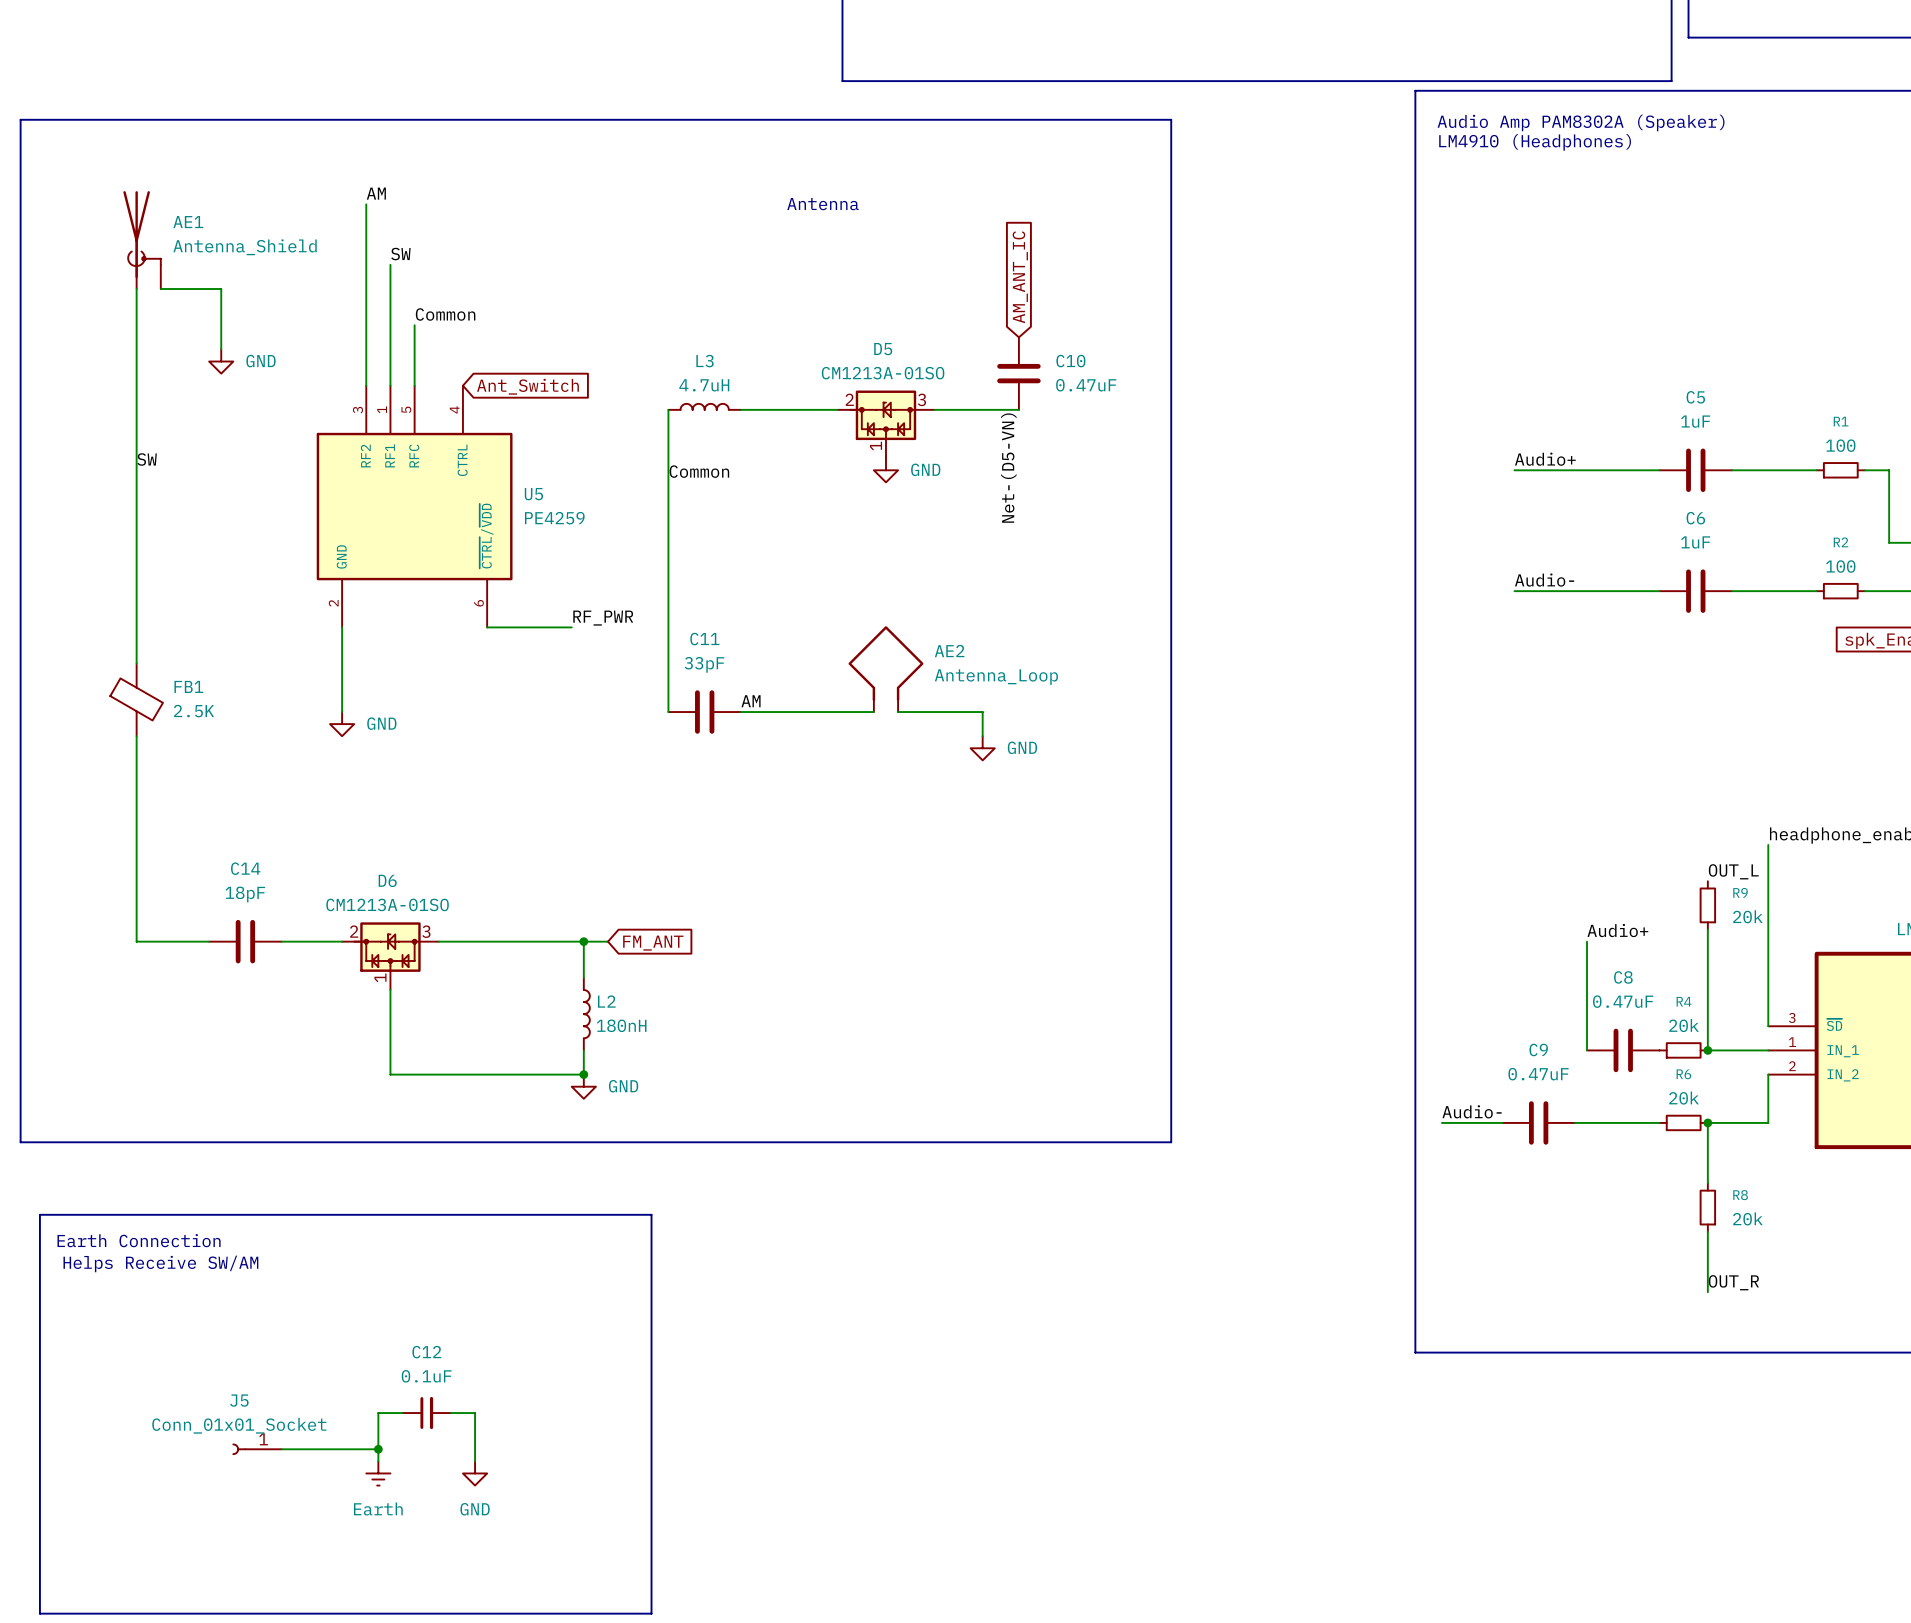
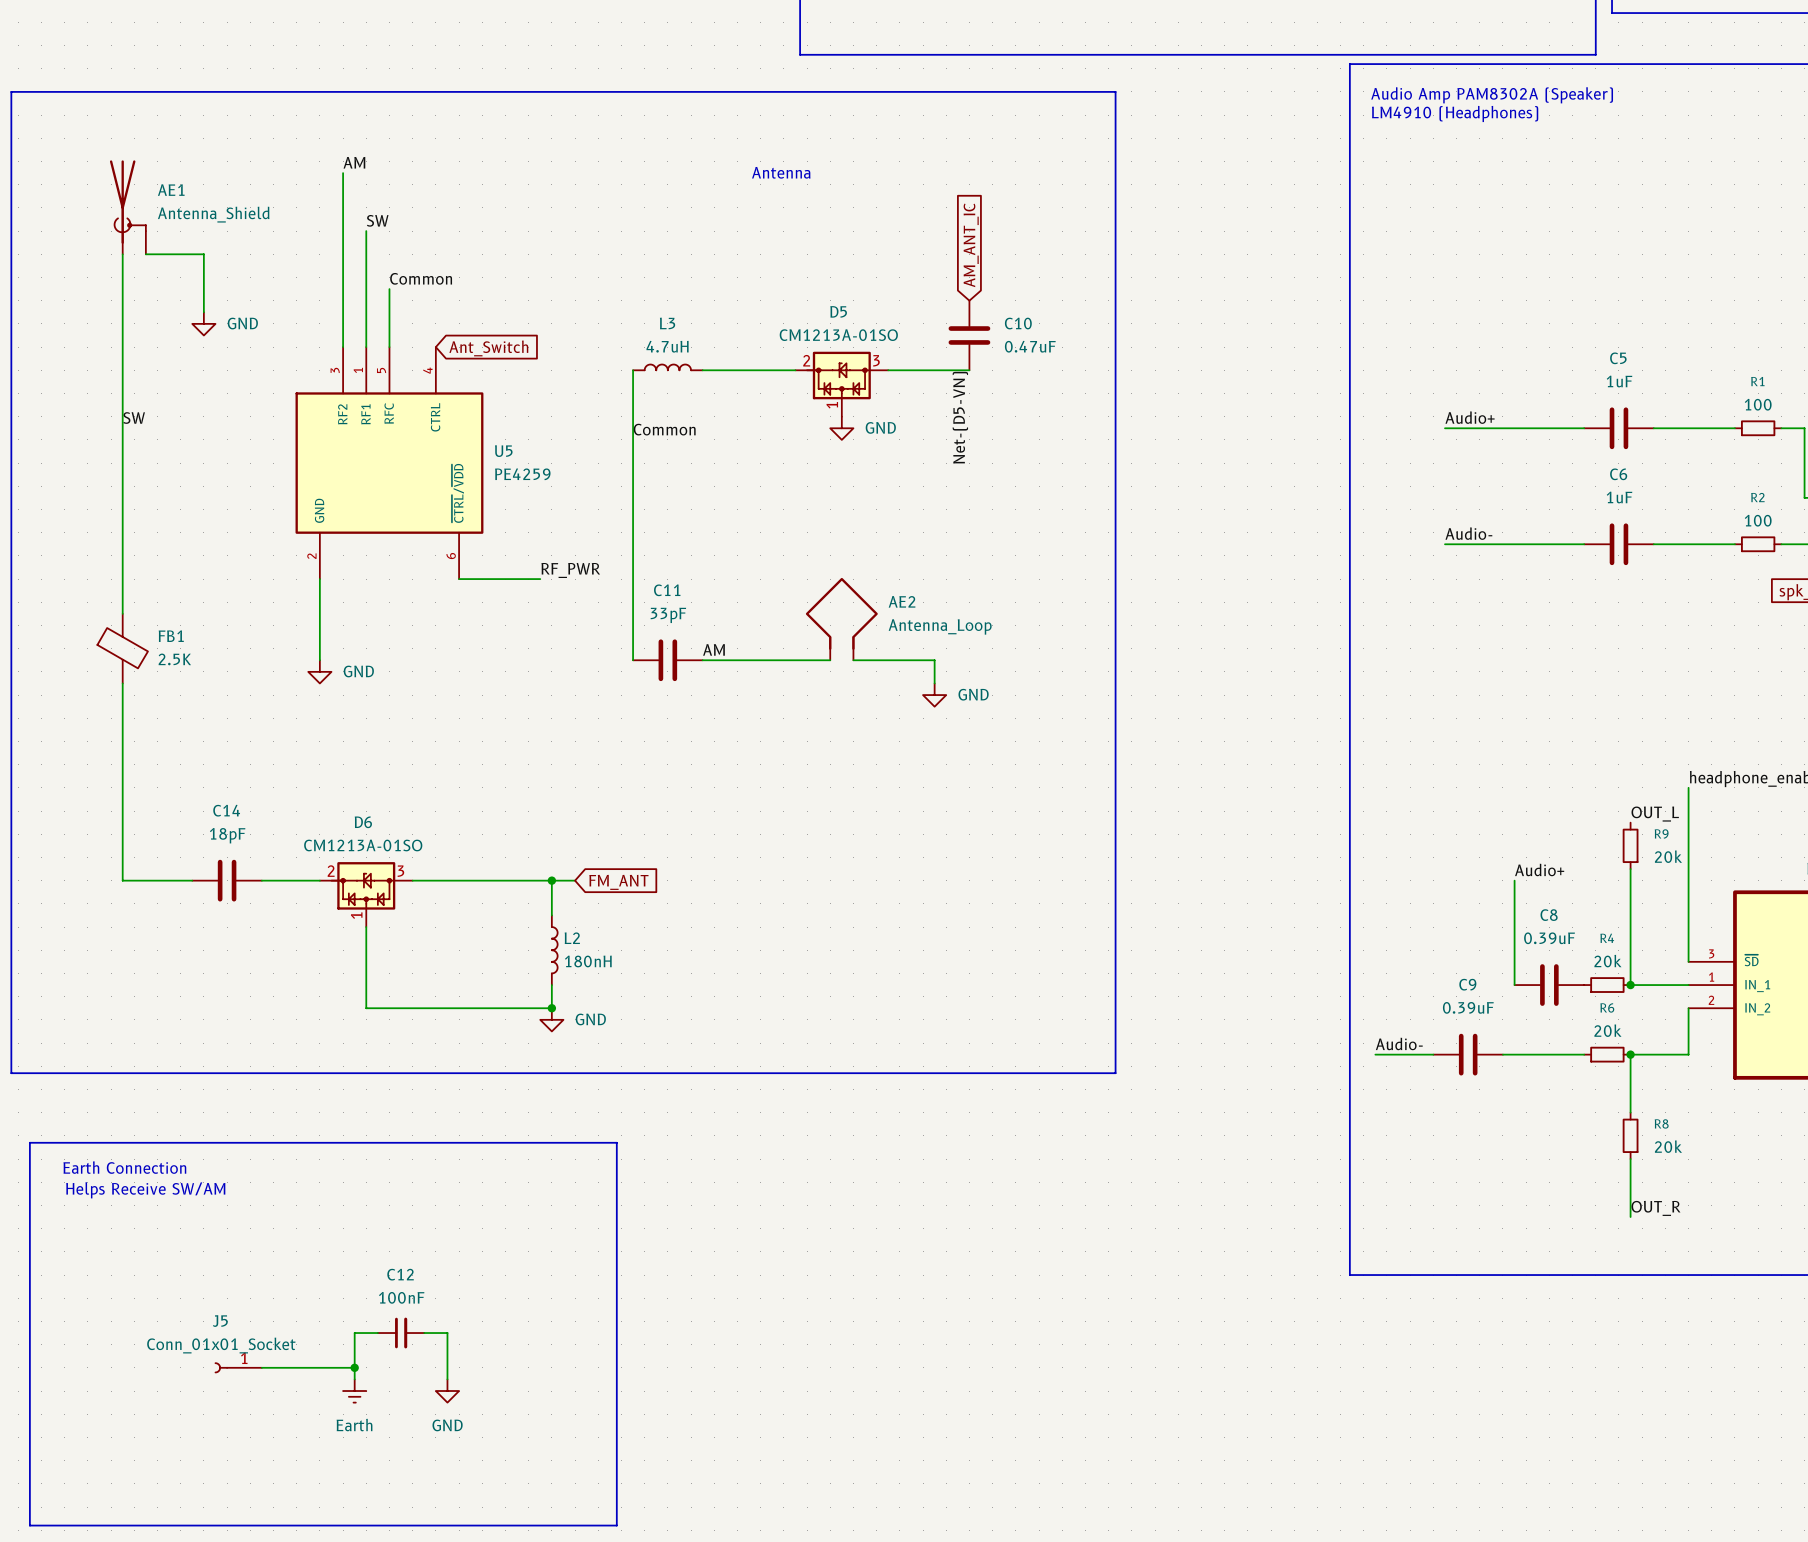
C8 value: 0.47uF (1623, 1001) -> 0.39uF (1549, 938)
C9 value: 0.47uF (1538, 1074) -> 0.39uF (1468, 1007)
C12 value: 0.1uF (426, 1376) -> 100nF (401, 1297)

